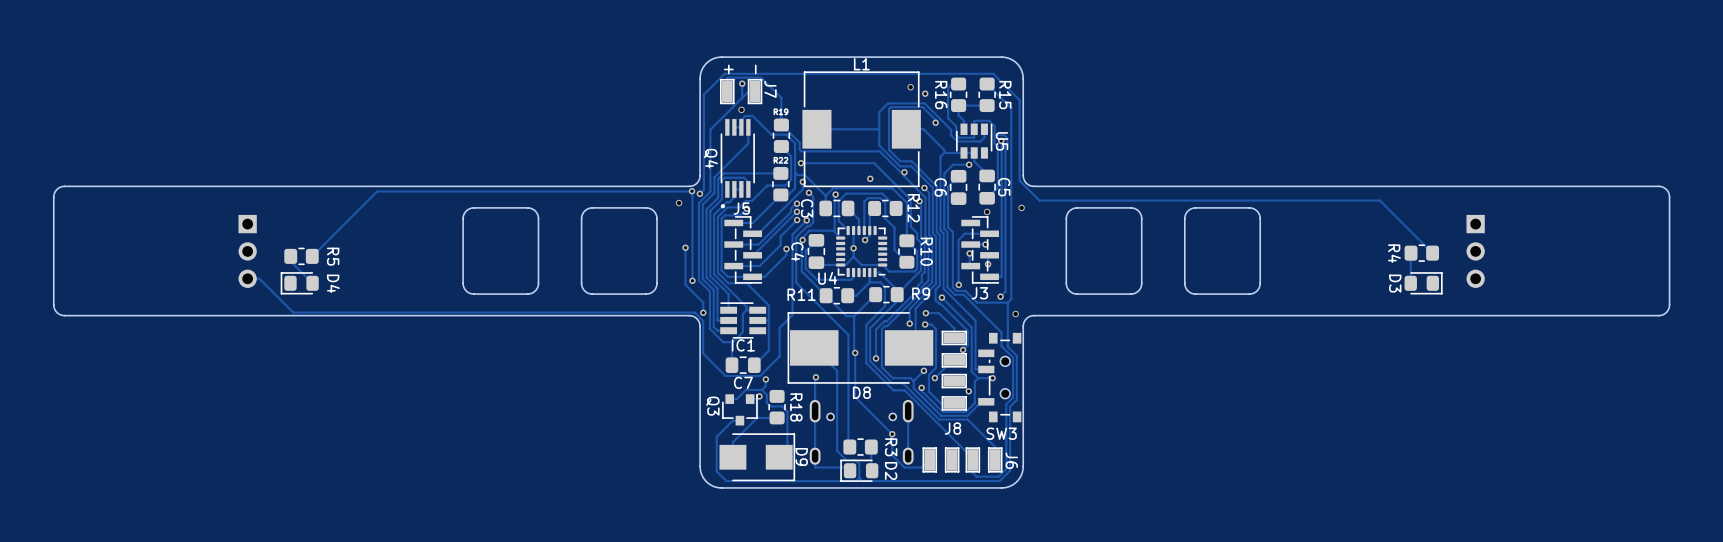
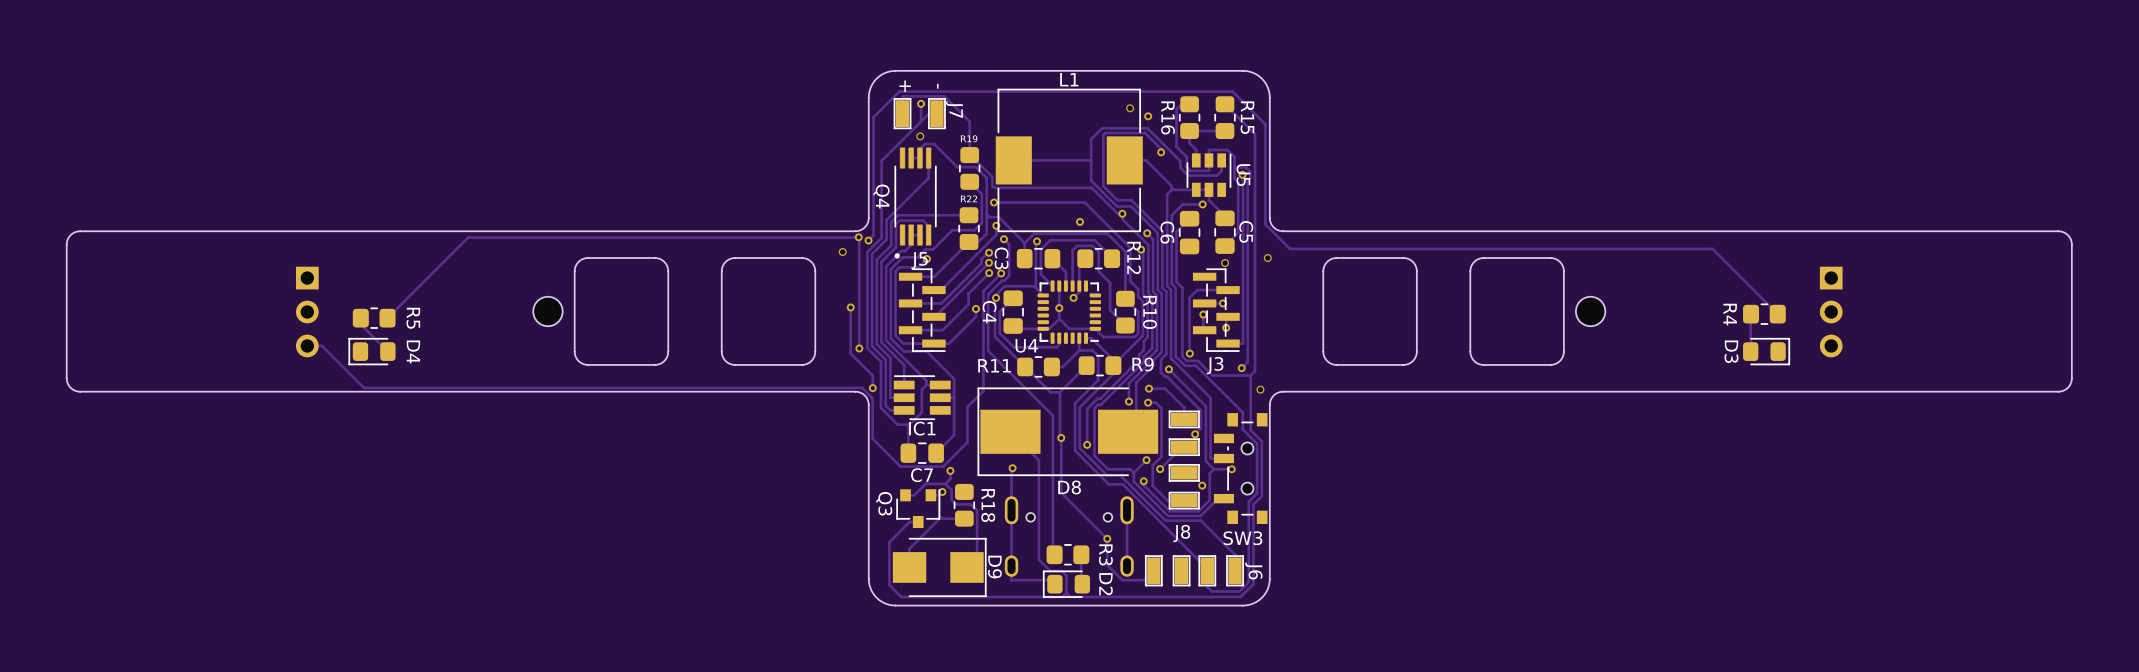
part: none -> (547, 311)
part: none -> (1590, 311)

